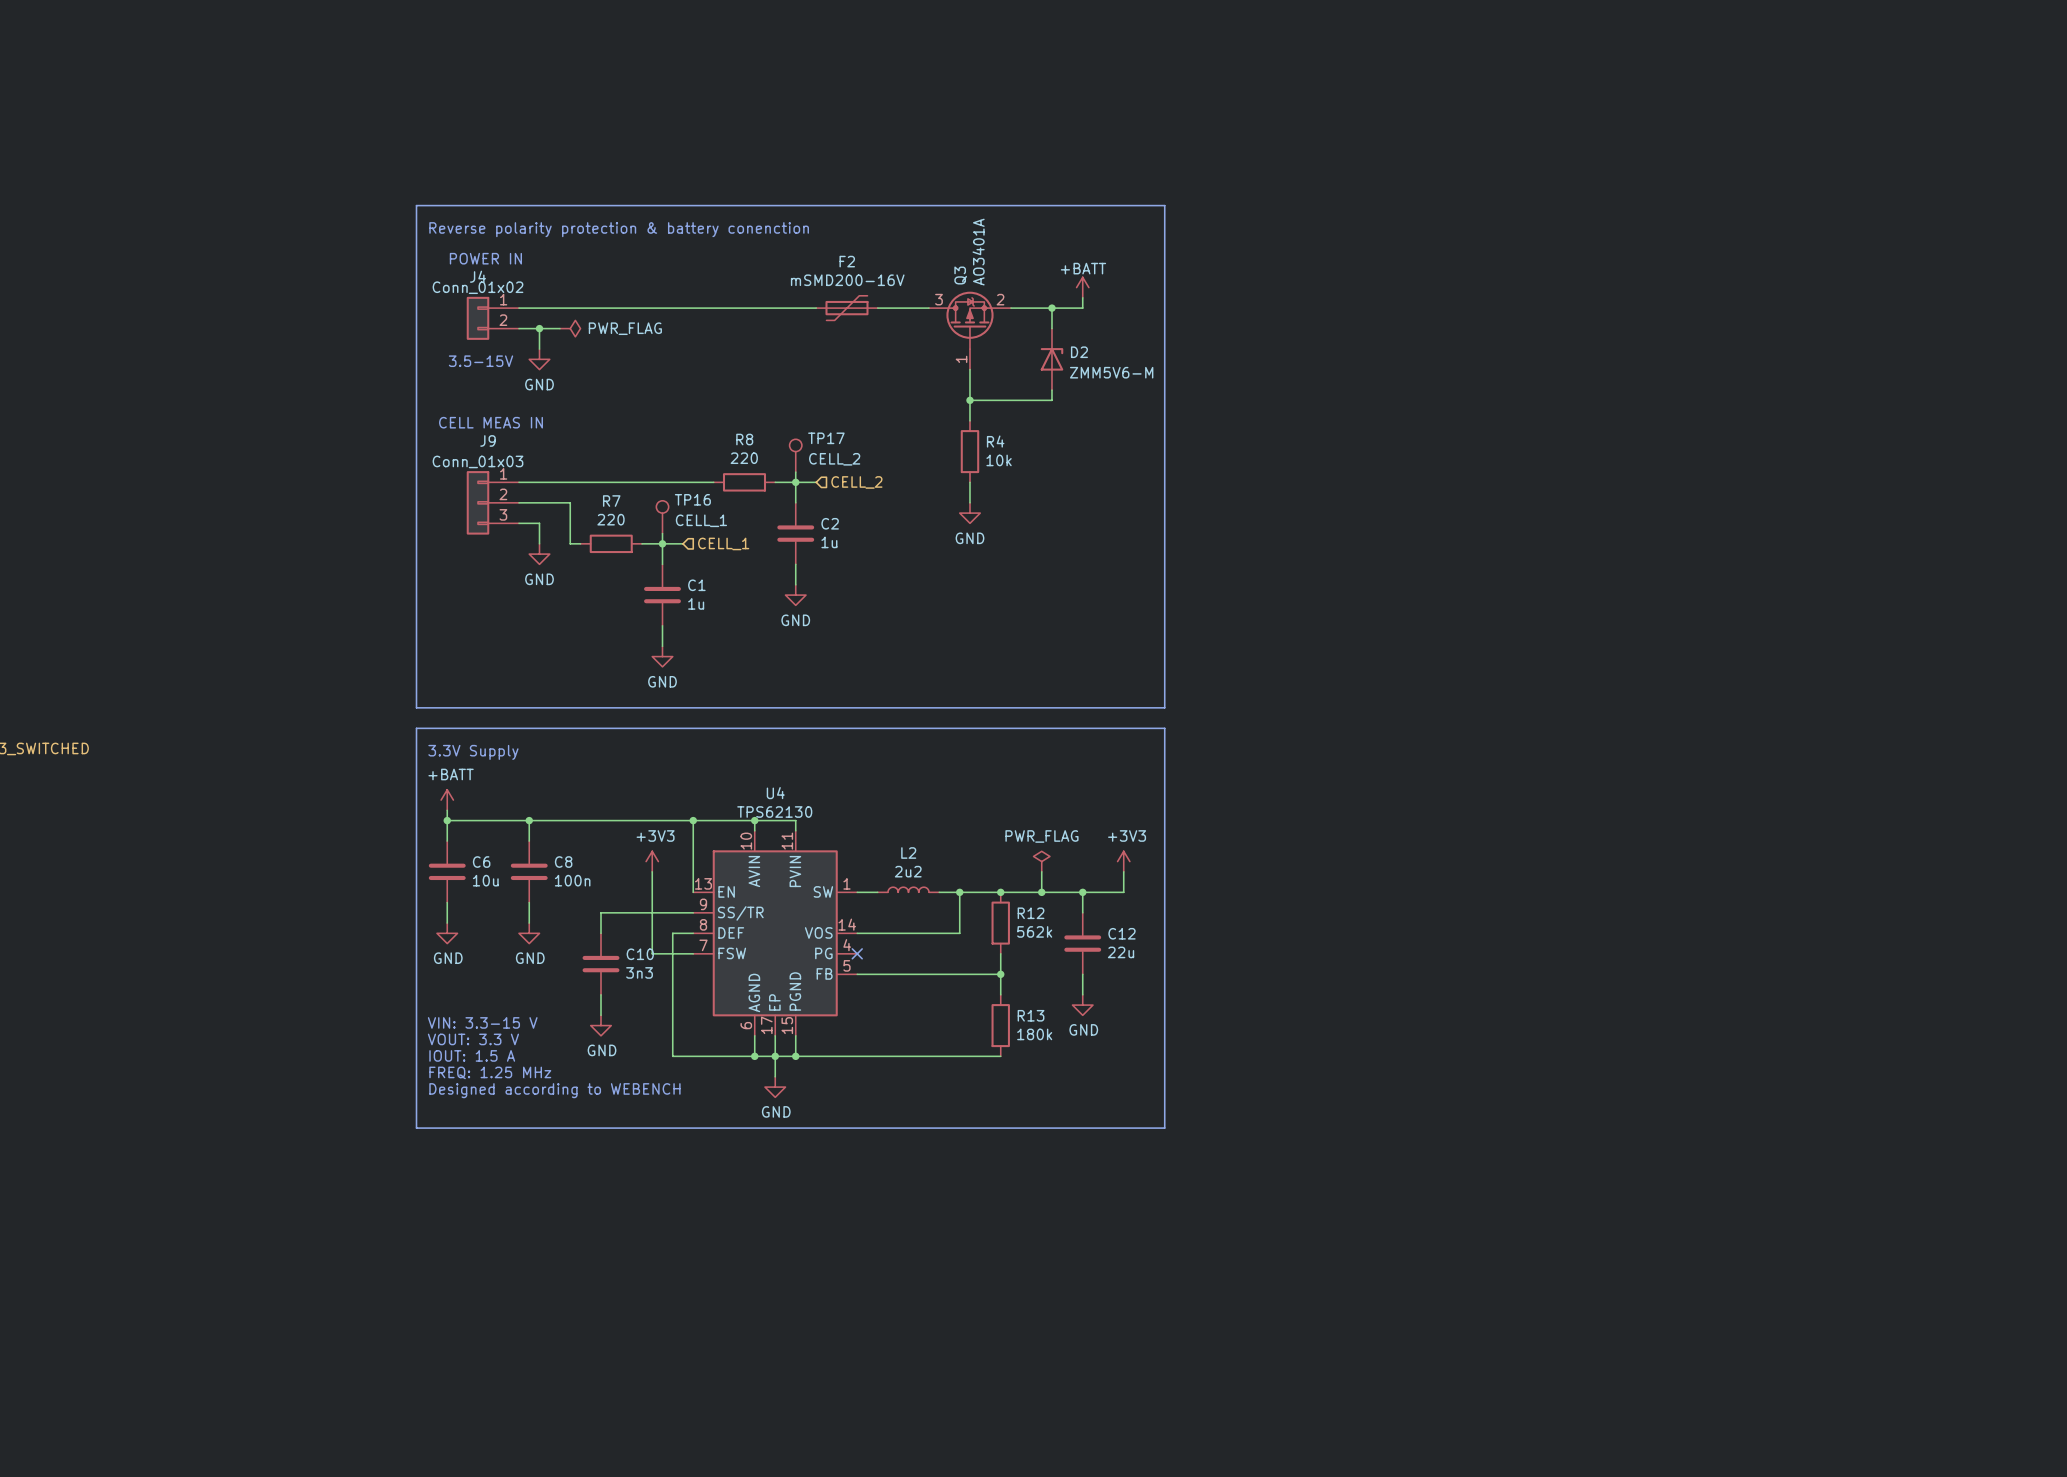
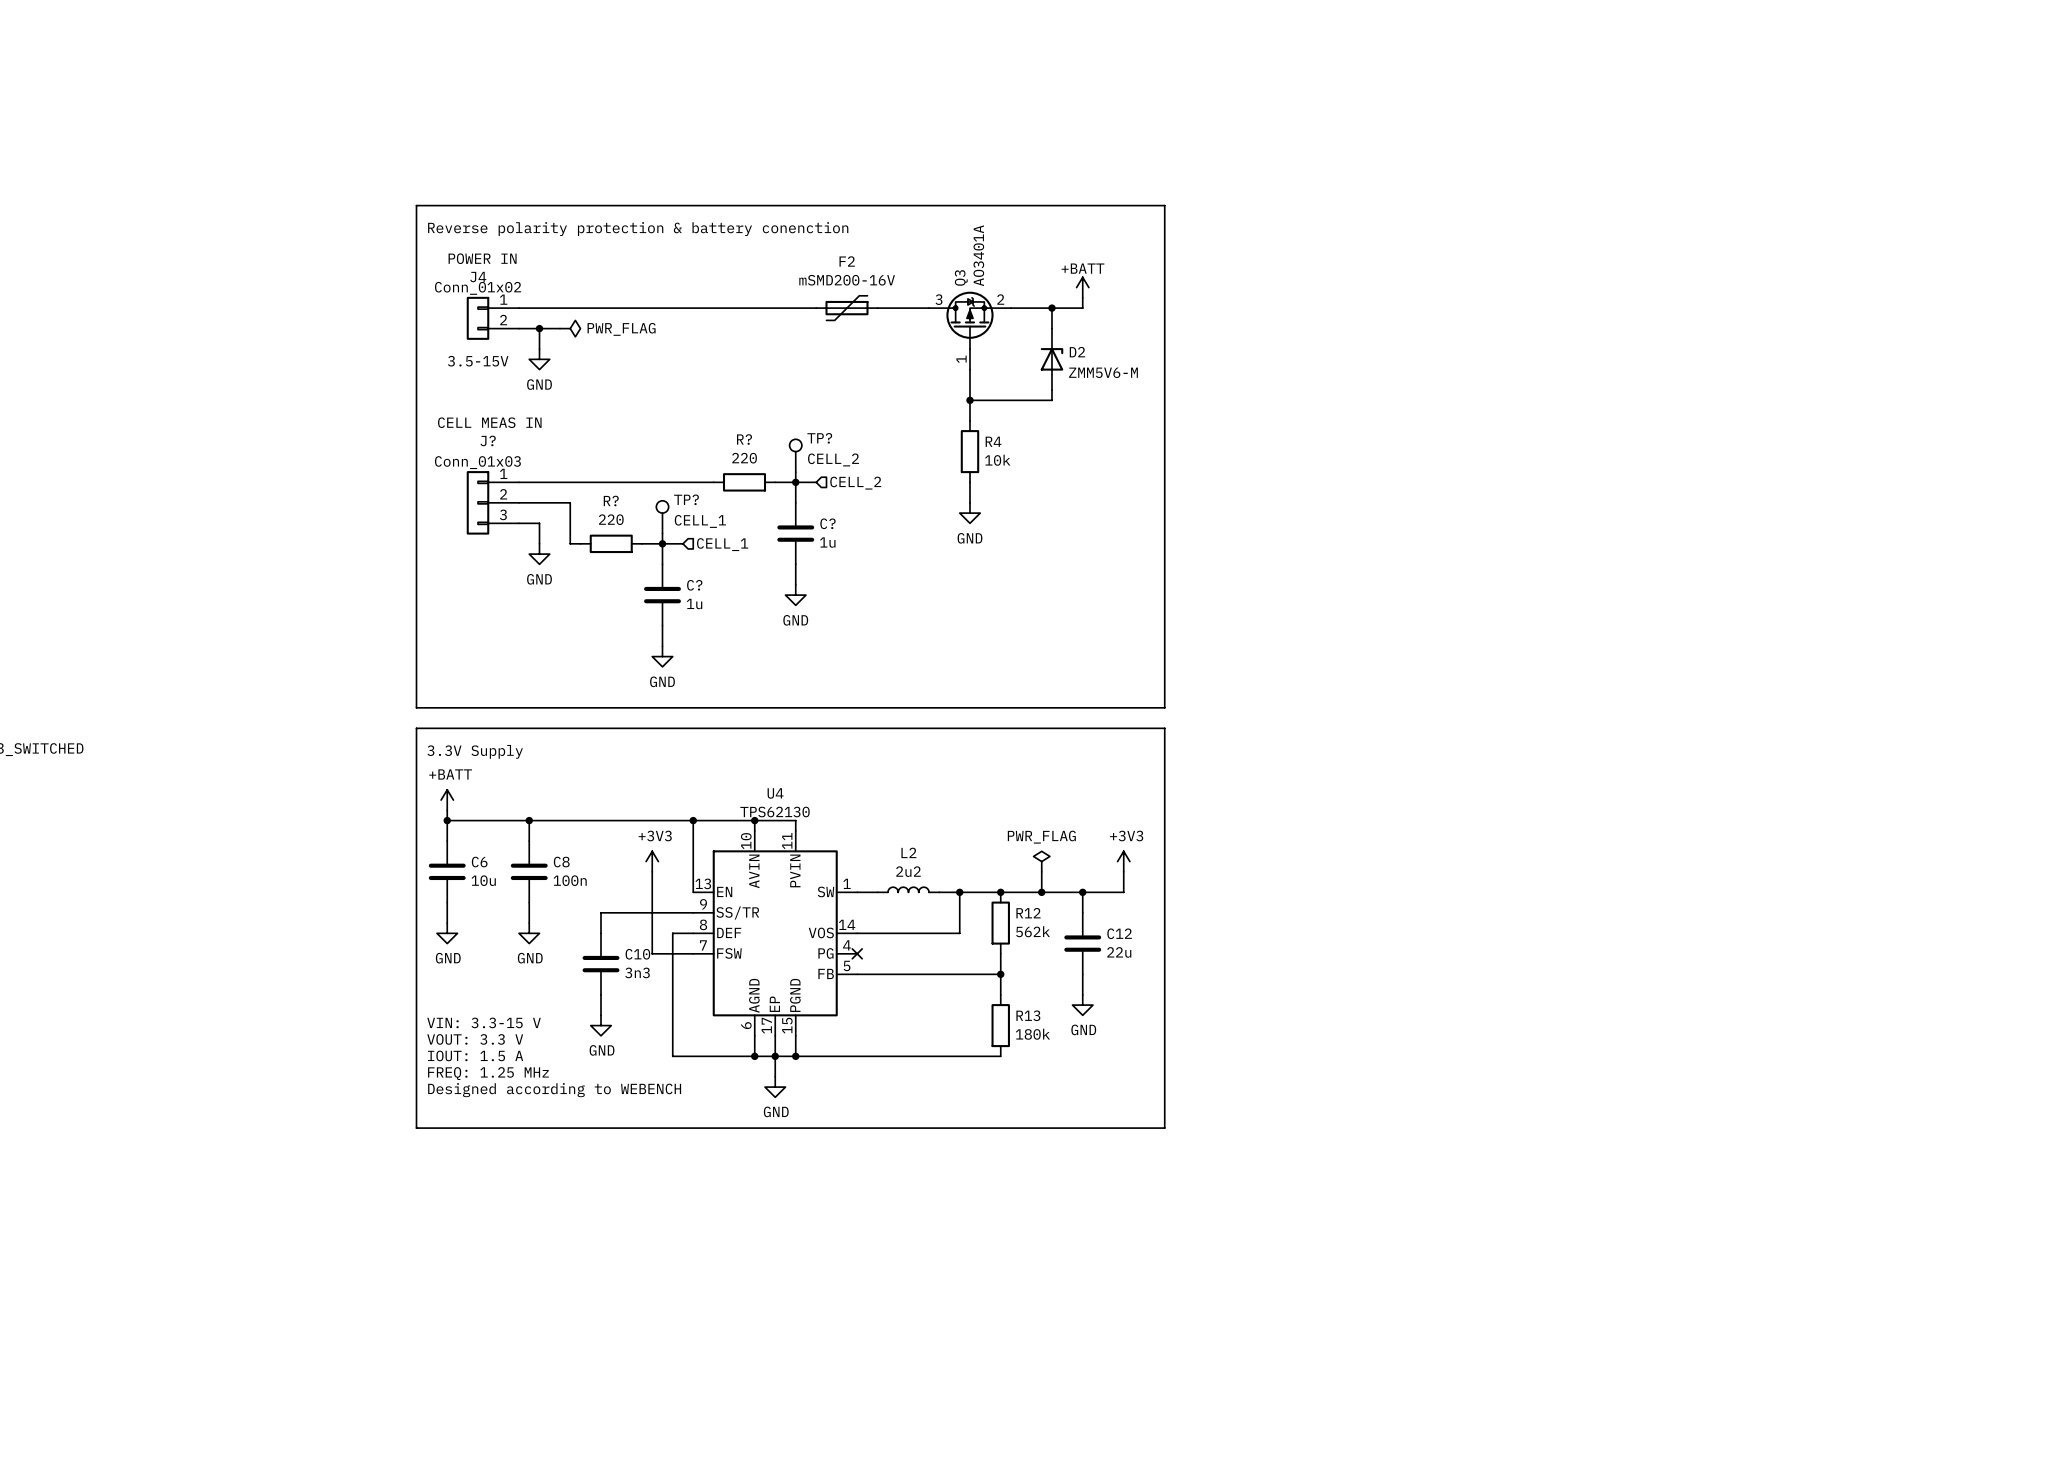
TP17 name: TP17 (826, 438) -> TP? (819, 438)
R8 name: R8 (744, 439) -> R? (744, 439)
J9 name: J9 (488, 440) -> J? (488, 440)
TP16 name: TP16 (692, 499) -> TP? (686, 499)
R7 name: R7 (611, 501) -> R? (611, 501)
C2 name: C2 (830, 523) -> C? (827, 523)
C1 name: C1 (696, 585) -> C? (694, 585)

